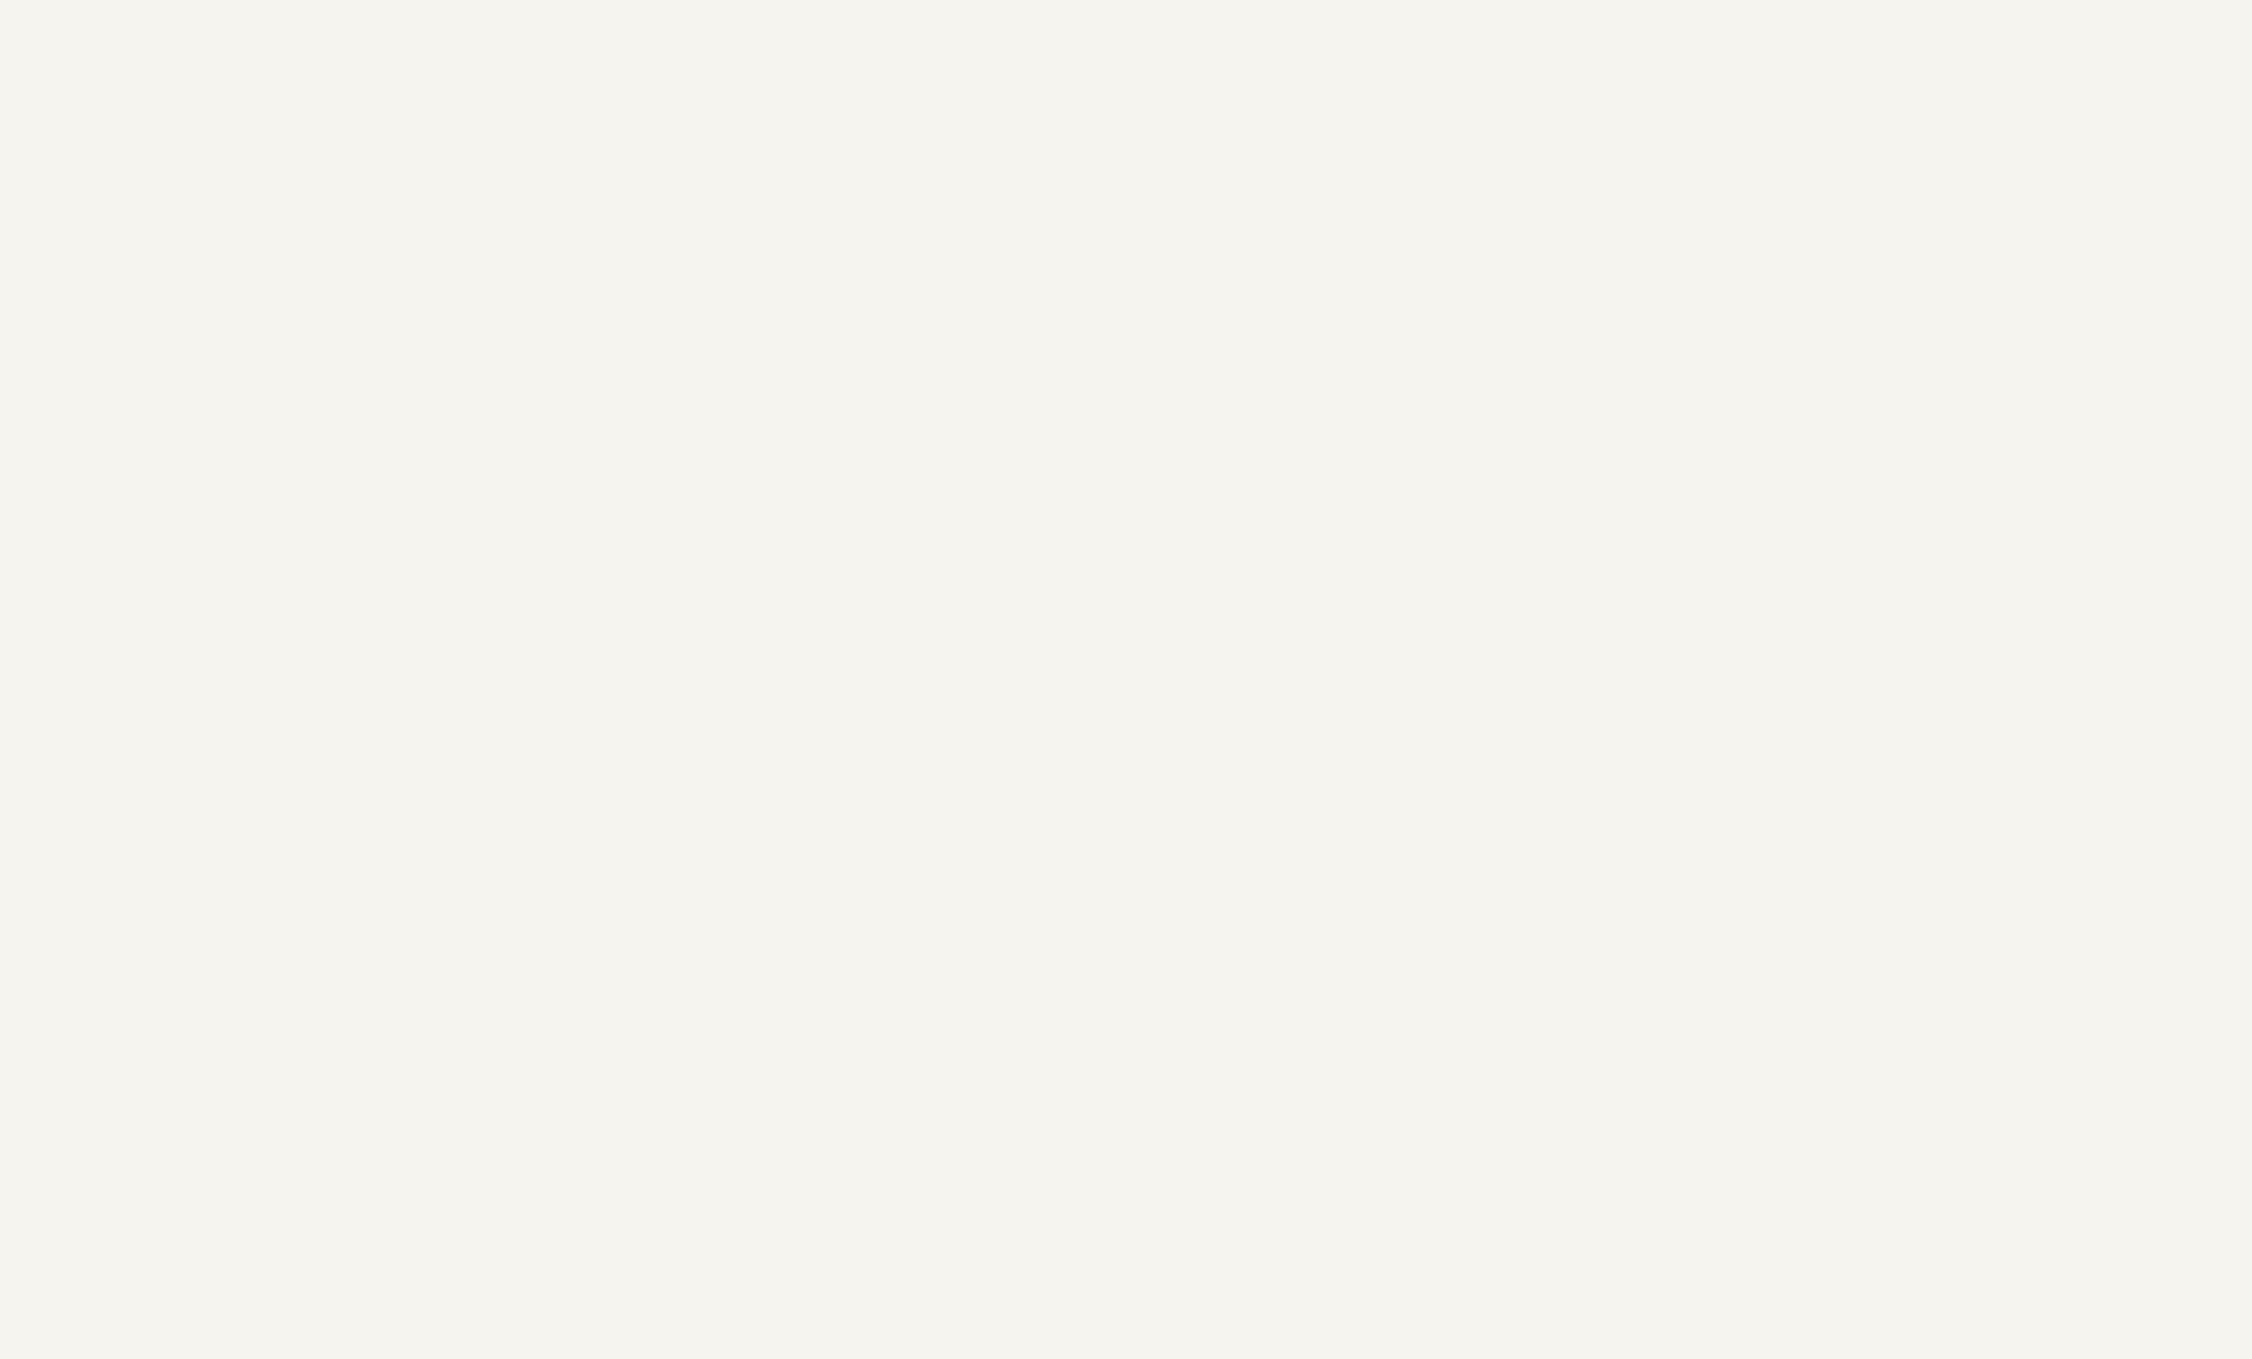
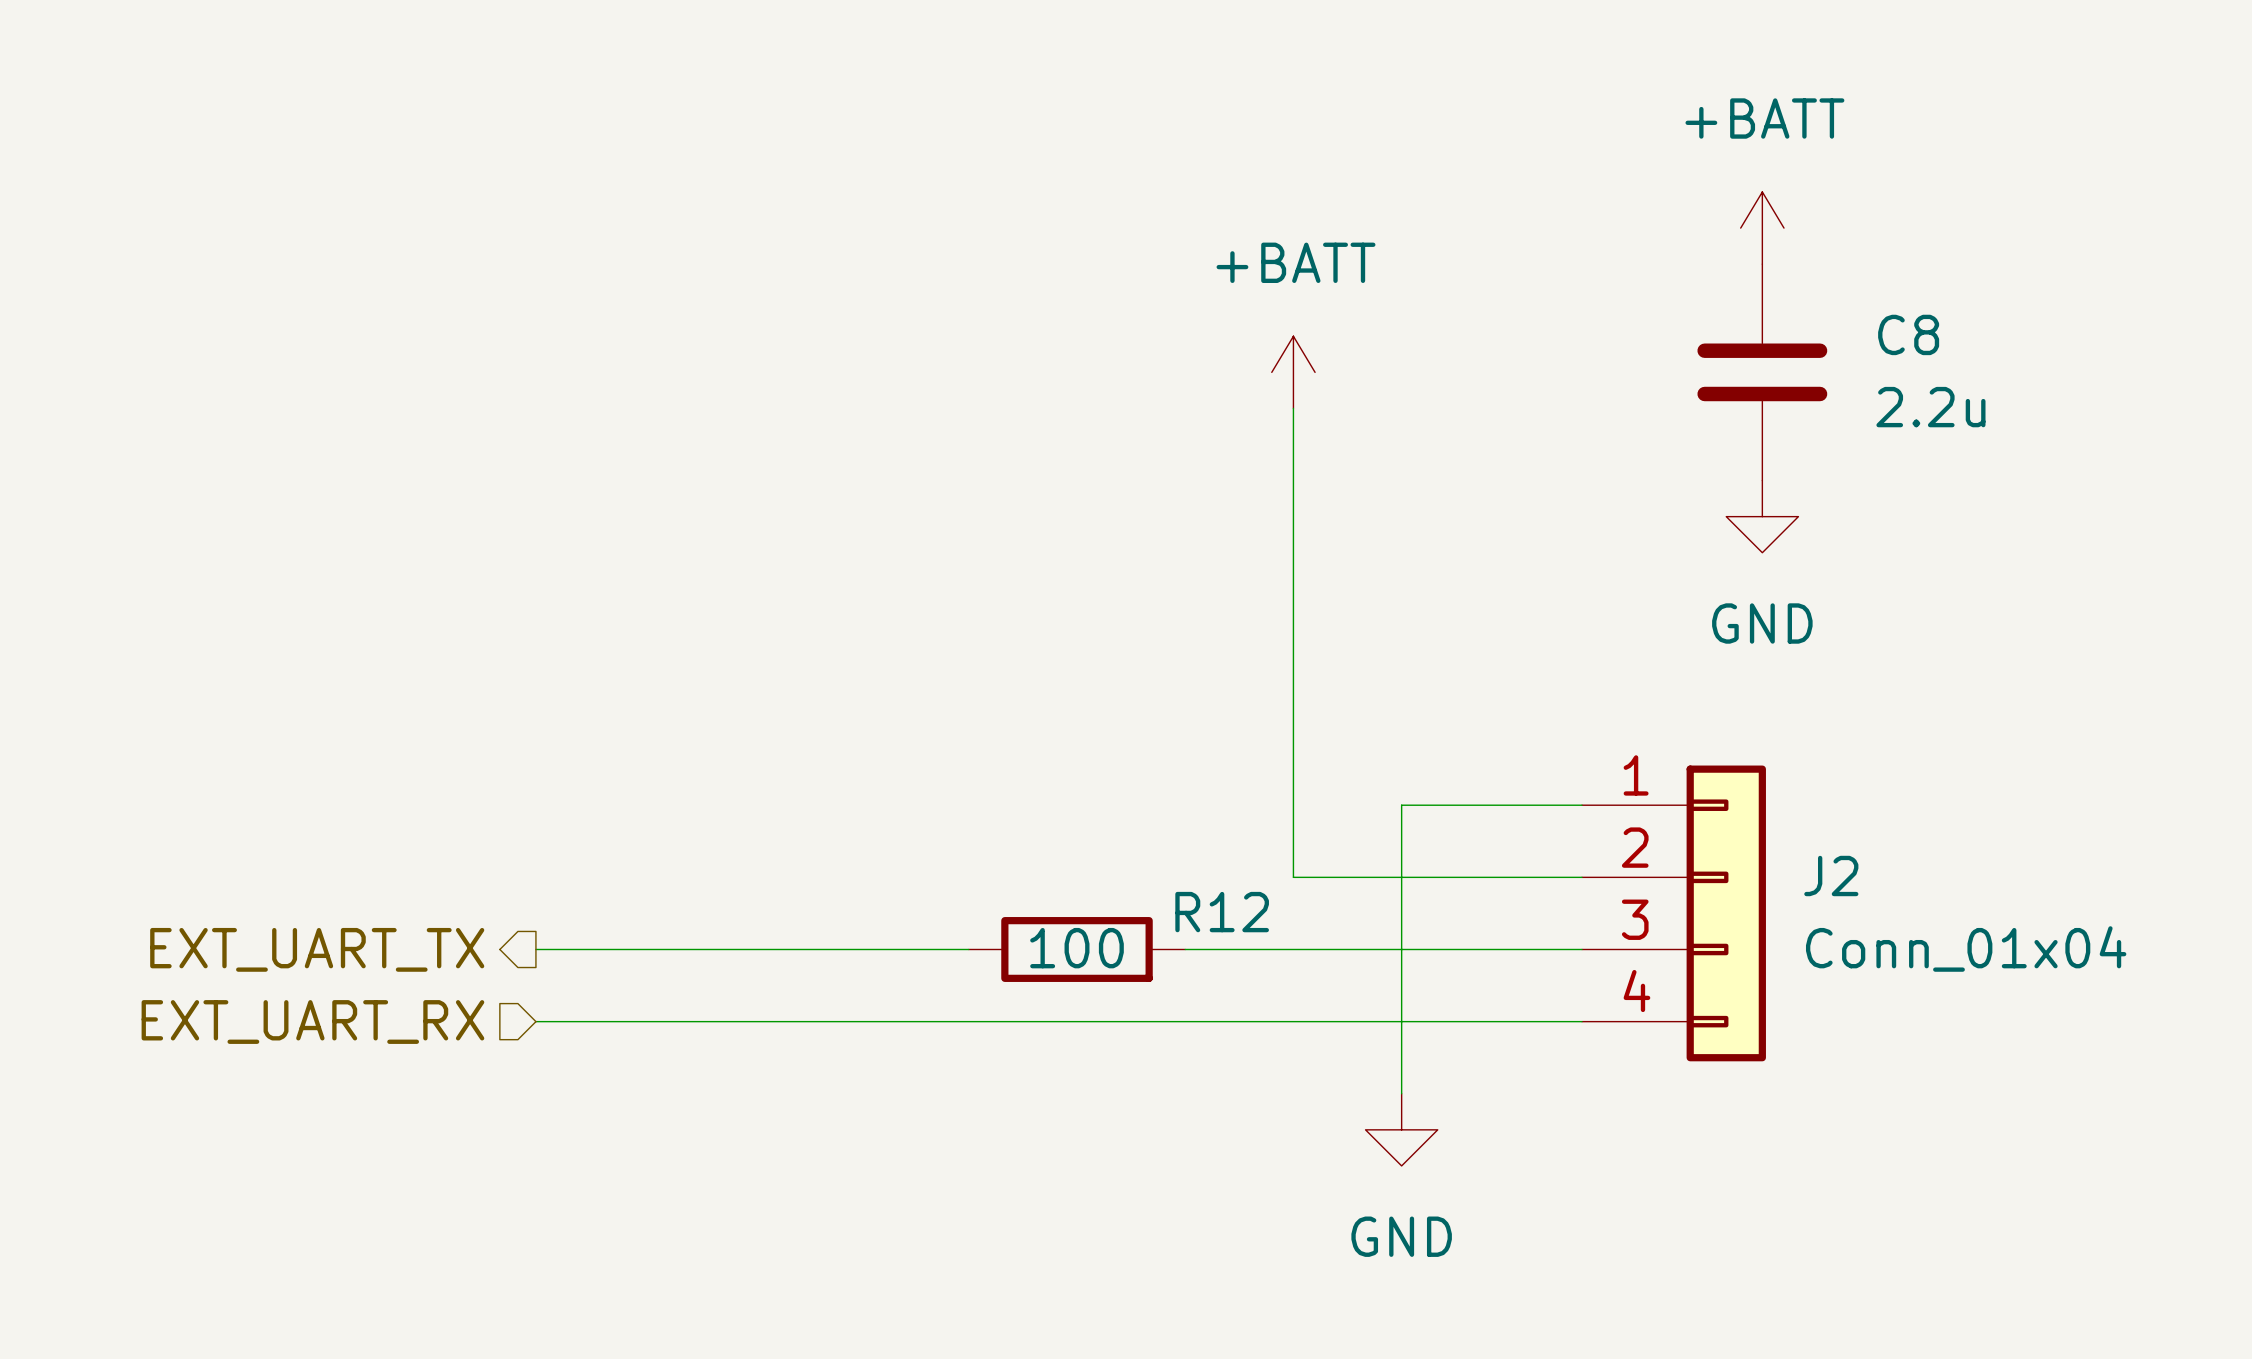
power symbol: none -> +BATT (1762, 228)
power symbol: none -> +BATT (1293, 372)
C8: none -> 2.2u (1762, 372)
wire: none -> (1293, 408) (1293, 877) (1581, 877)
power symbol: none -> GND (1762, 516)
wire: none -> (1581, 805) (1401, 805) (1401, 1093)
J2: none -> Conn_01x04 (1673, 913)
hierarchical label: none -> EXT_UART_TX (317, 949)
wire: none -> (535, 949) (968, 949)
R12: none -> 100 (1077, 949)
wire: none -> (1185, 949) (1581, 949)
wire: none -> (535, 1021) (1581, 1021)
hierarchical label: none -> EXT_UART_RX (312, 1022)
power symbol: none -> GND (1401, 1129)

